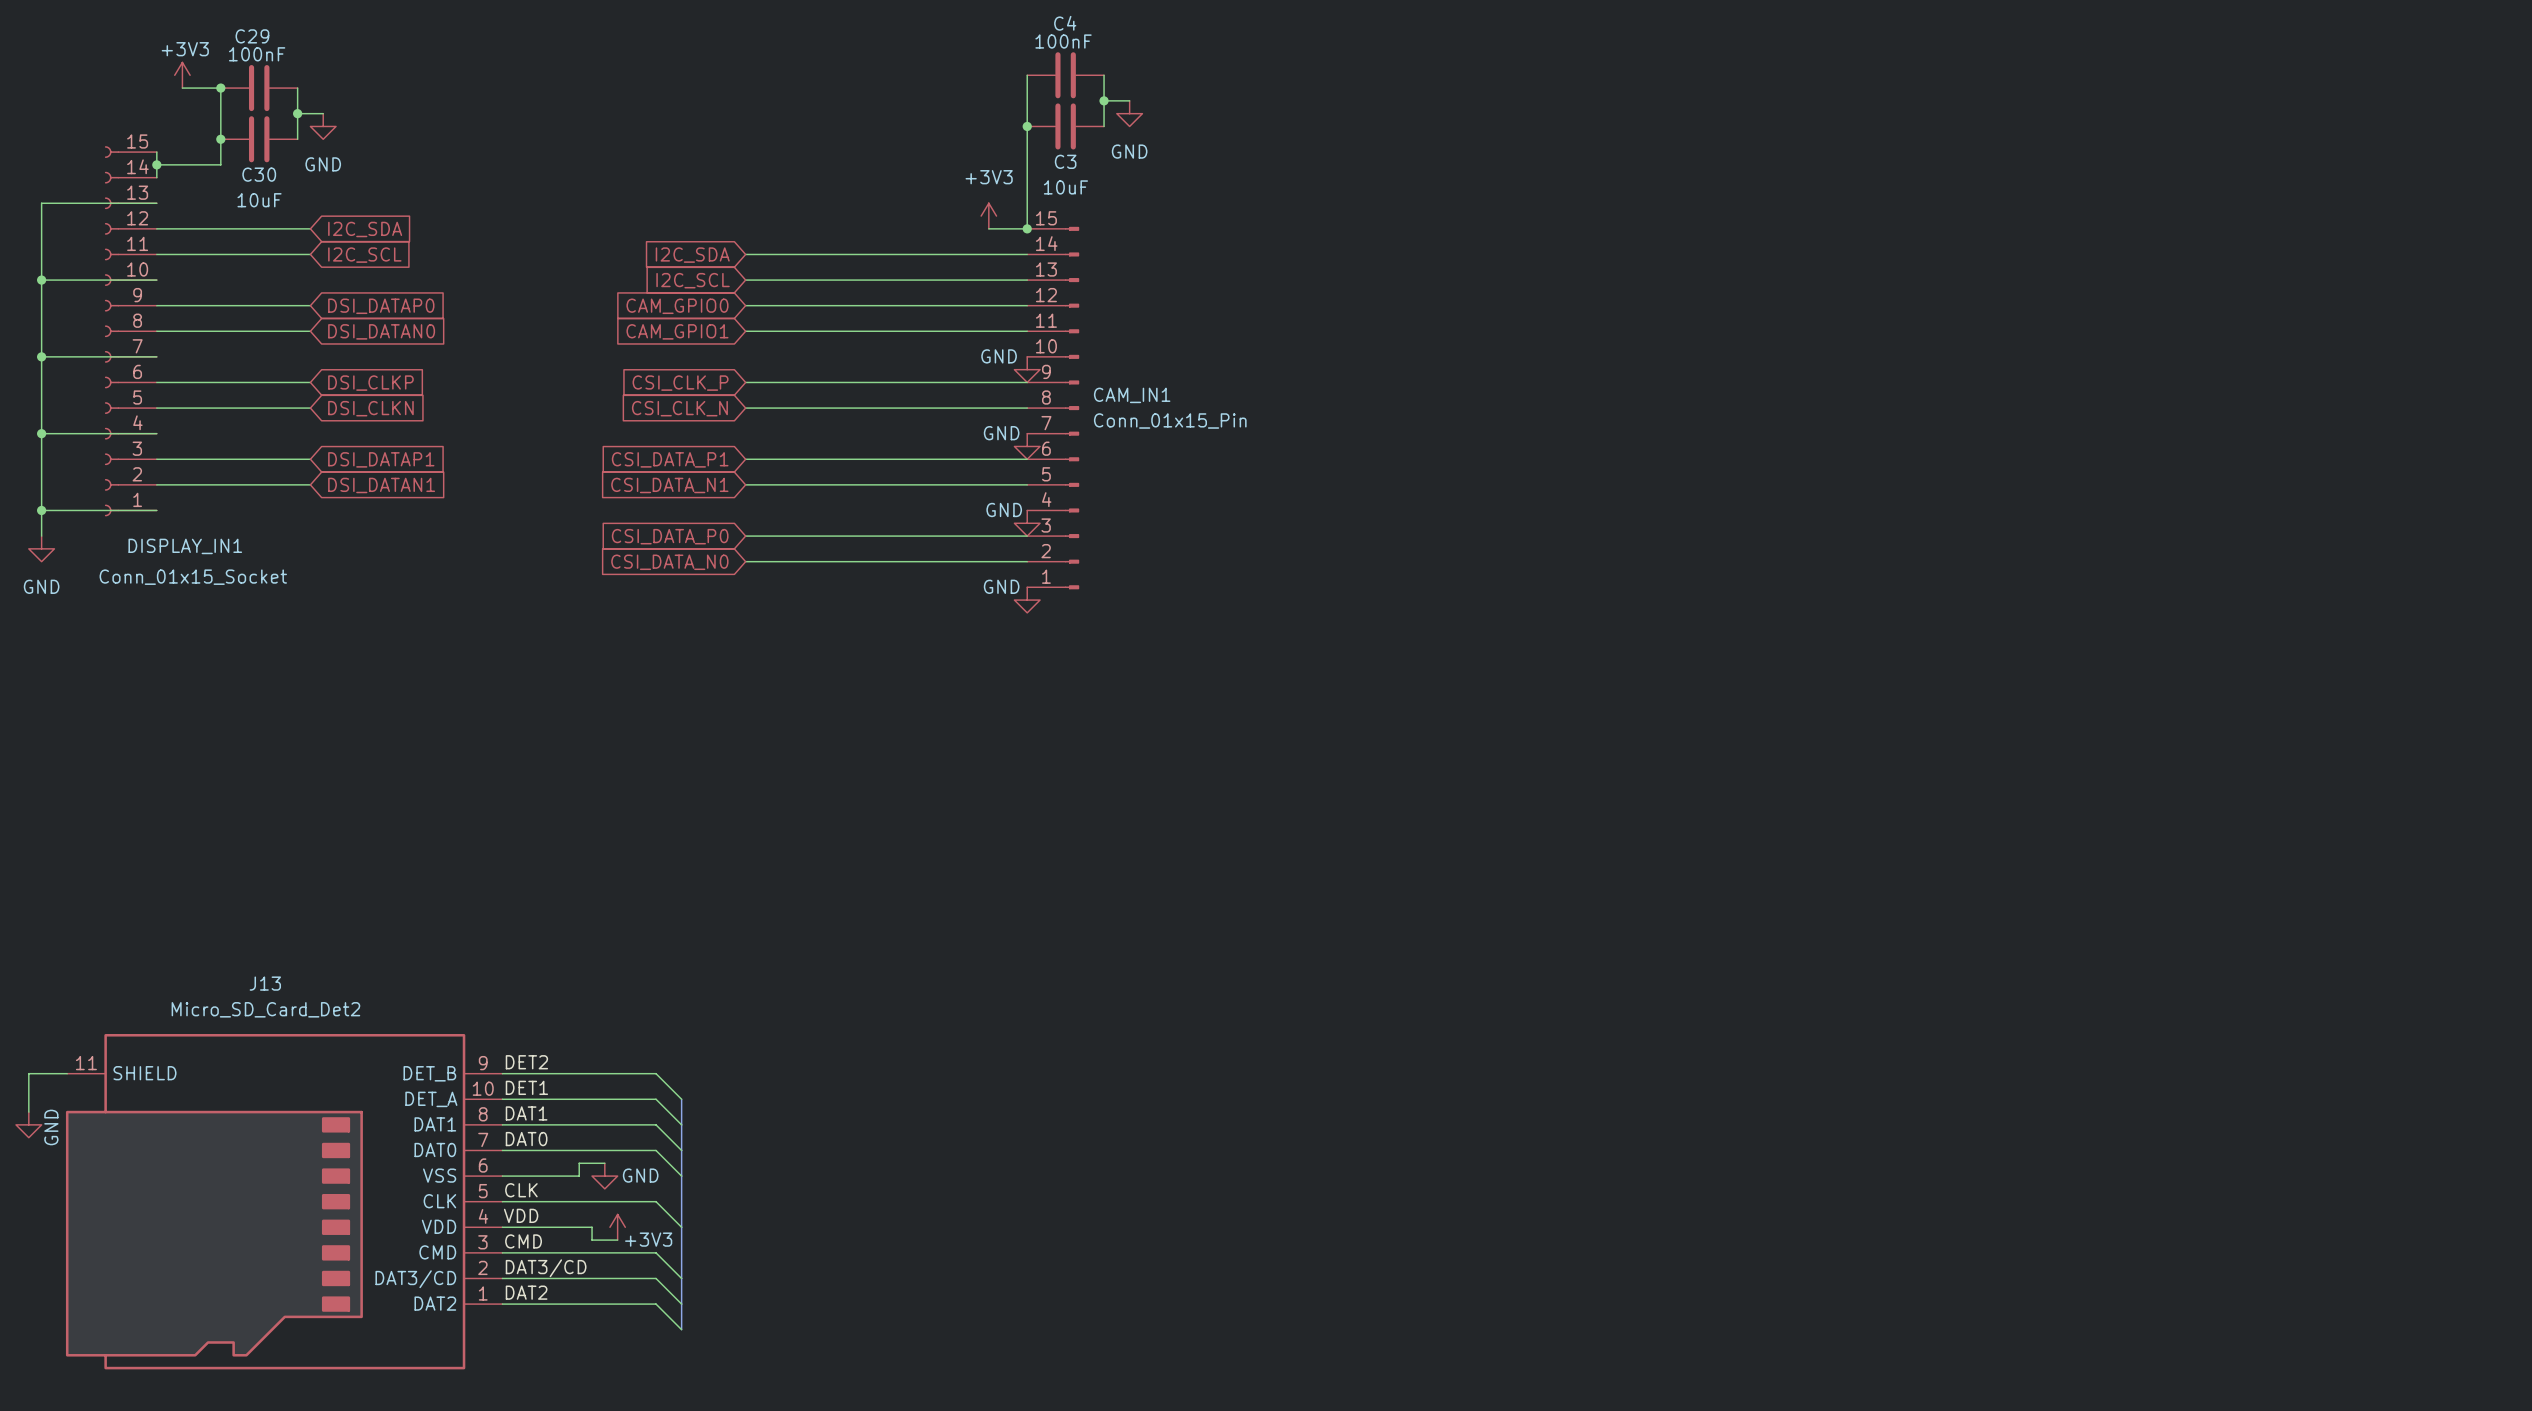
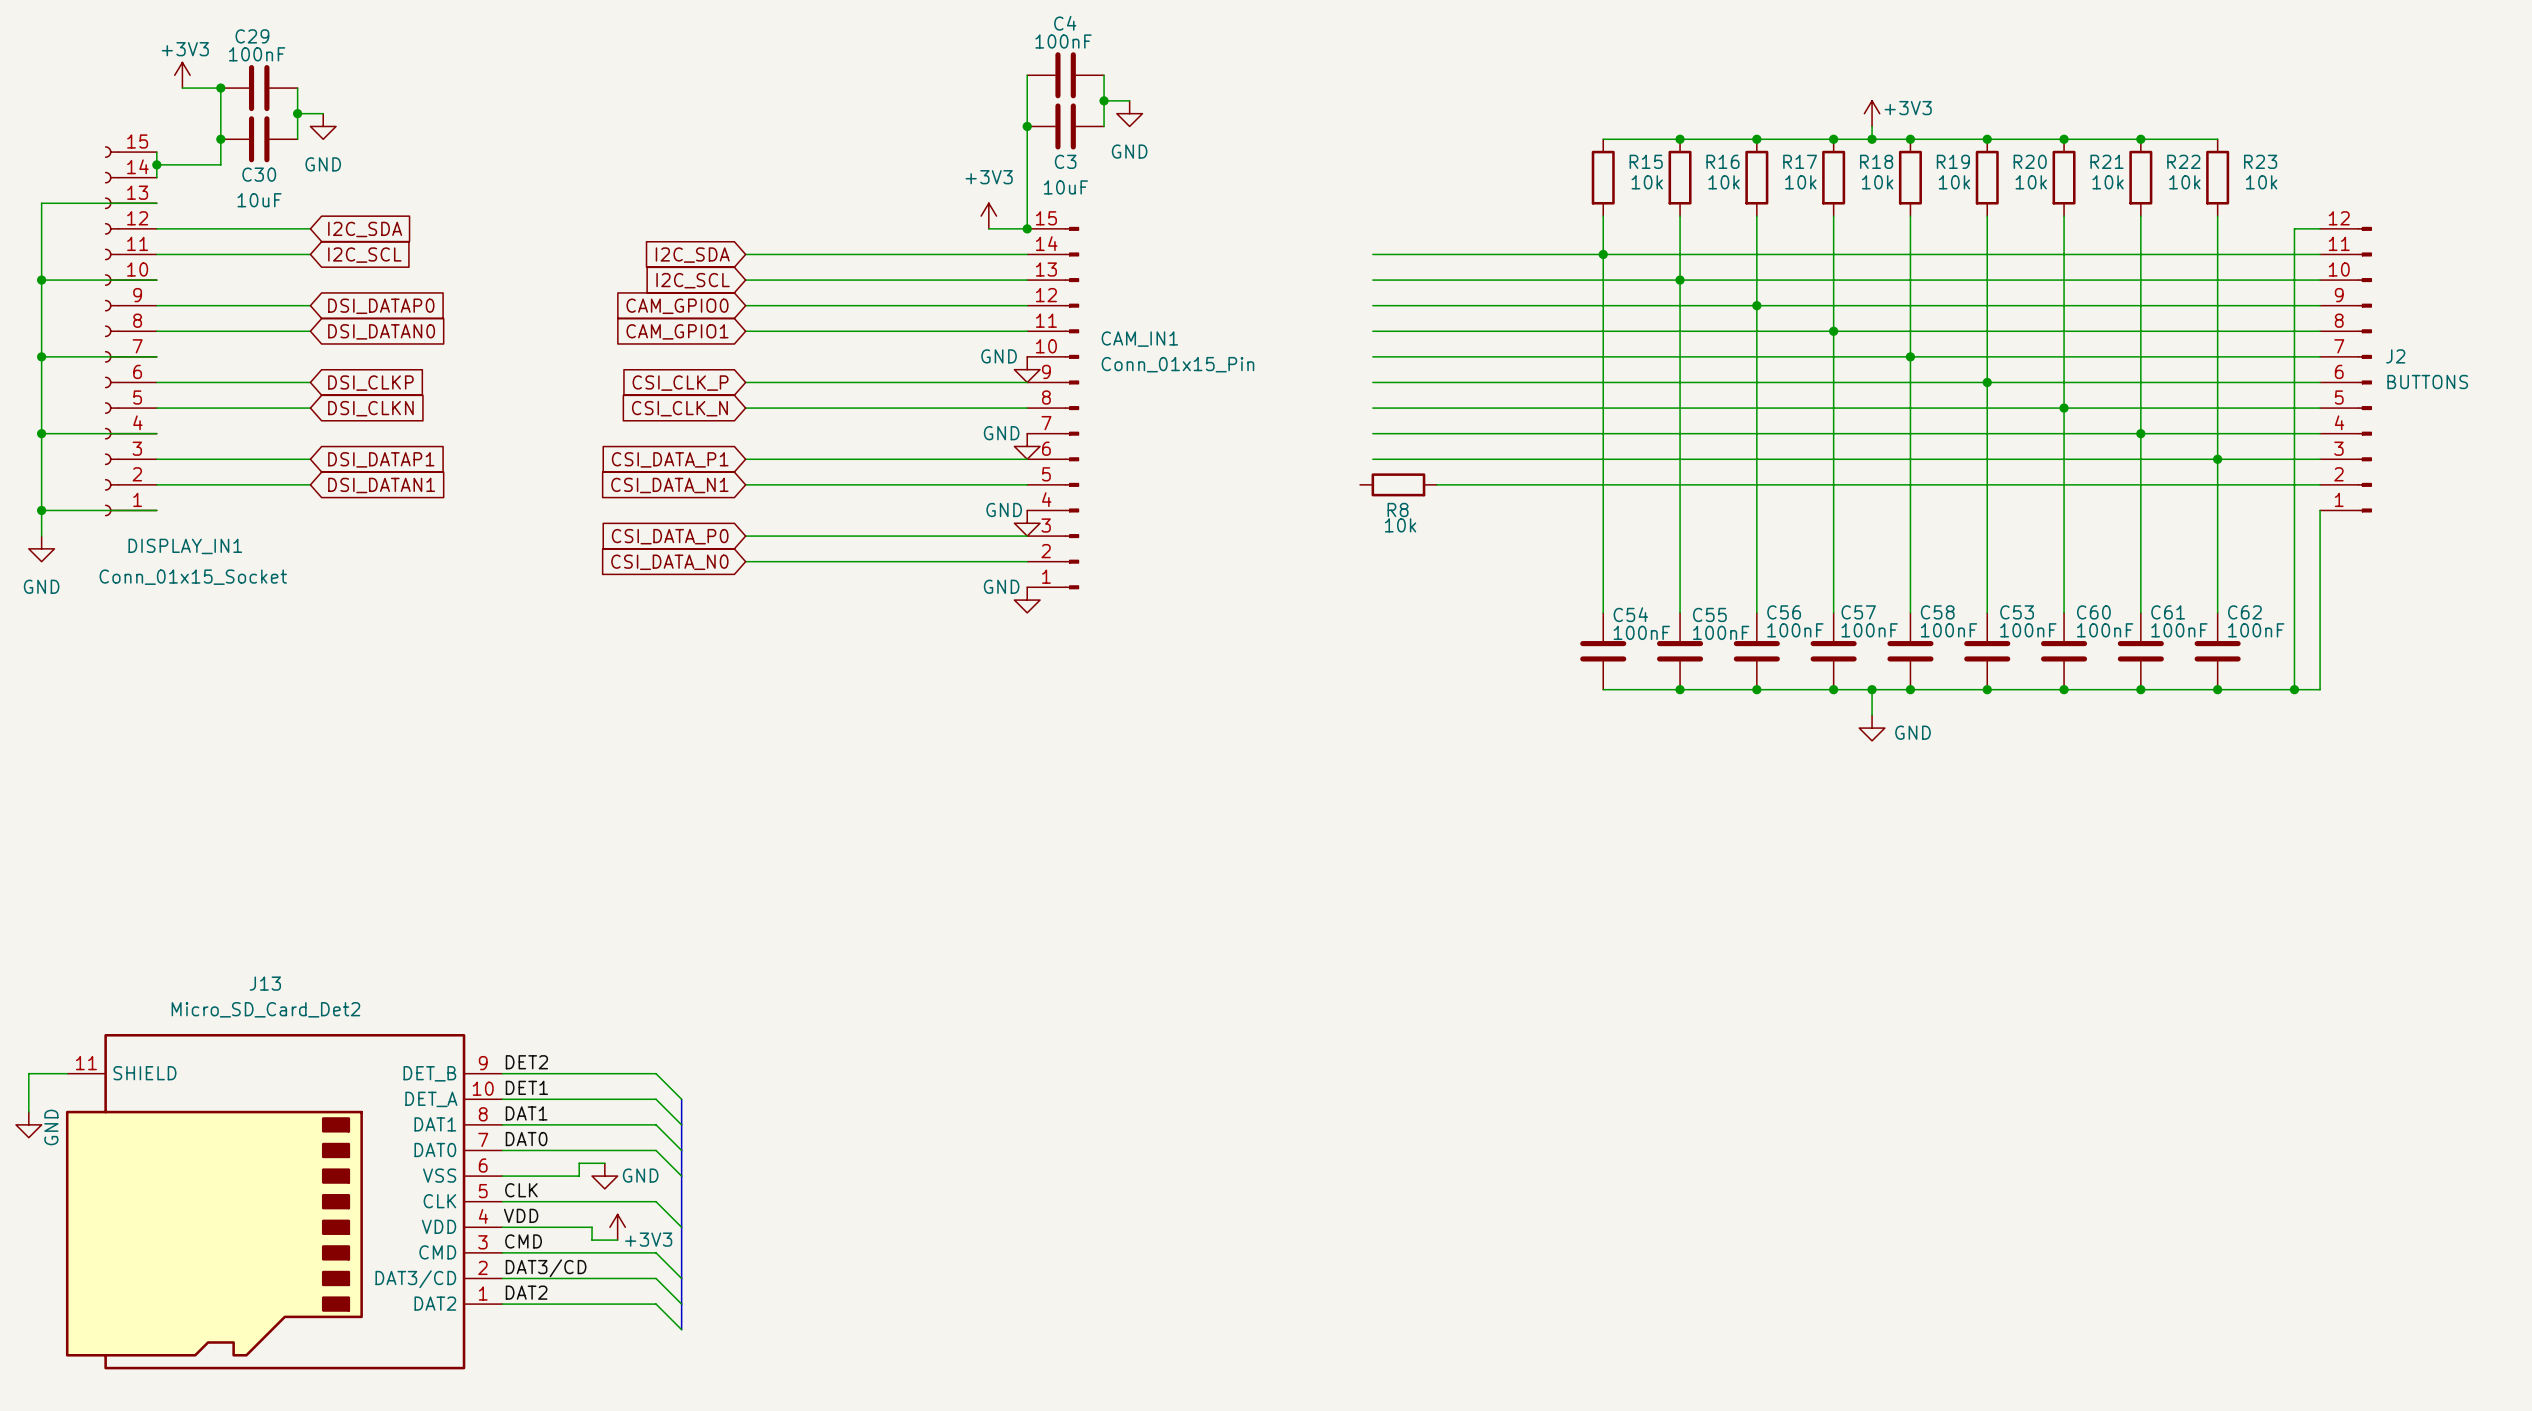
power symbol: none -> +3V3 (1872, 113)
wire: none -> (1872, 126) (1872, 139)
wire: none -> (1603, 139) (2217, 139)
junction: none -> (1680, 139)
junction: none -> (1756, 139)
junction: none -> (1833, 139)
junction: none -> (1872, 139)
junction: none -> (1910, 139)
junction: none -> (1987, 139)
junction: none -> (2064, 139)
junction: none -> (2140, 139)
R15: none -> 10k (1603, 177)
R16: none -> 10k (1680, 177)
R17: none -> 10k (1756, 177)
R18: none -> 10k (1833, 177)
R19: none -> 10k (1910, 177)
R20: none -> 10k (1987, 177)
R21: none -> 10k (2064, 177)
R22: none -> 10k (2140, 177)
R23: none -> 10k (2217, 177)
wire: none -> (1603, 216) (1603, 612)
wire: none -> (1680, 216) (1680, 612)
wire: none -> (1756, 216) (1756, 612)
wire: none -> (1833, 216) (1833, 612)
wire: none -> (1910, 216) (1910, 612)
wire: none -> (1987, 216) (1987, 612)
wire: none -> (2064, 216) (2064, 612)
wire: none -> (2140, 216) (2140, 612)
wire: none -> (2217, 216) (2217, 612)
wire: none -> (2320, 228) (2294, 228) (2294, 689)
wire: none -> (1372, 254) (2320, 254)
junction: none -> (1603, 254)
wire: none -> (1372, 280) (2320, 280)
junction: none -> (1680, 280)
wire: none -> (1372, 305) (2320, 305)
junction: none -> (1756, 305)
wire: none -> (1372, 331) (2320, 331)
junction: none -> (1833, 331)
wire: none -> (1372, 356) (2320, 356)
junction: none -> (1910, 356)
J2: none -> BUTTONS (2346, 369)
wire: none -> (1372, 382) (2320, 382)
junction: none -> (1987, 382)
CAM_IN1 name position: CAM_IN1 (1132, 395) -> CAM_IN1 (1139, 339)
wire: none -> (1372, 408) (2320, 408)
junction: none -> (2064, 408)
CAM_IN1 value position: Conn_01x15_Pin (1170, 421) -> Conn_01x15_Pin (1177, 364)
wire: none -> (1372, 433) (2320, 433)
junction: none -> (2140, 433)
wire: none -> (1372, 459) (2320, 459)
junction: none -> (2217, 459)
R8: none -> 10k (1398, 484)
wire: none -> (1436, 484) (2320, 484)
wire: none -> (2320, 510) (2320, 689) (1603, 689)
C54: none -> 100nF (1603, 651)
C55: none -> 100nF (1680, 651)
C56: none -> 100nF (1756, 651)
C57: none -> 100nF (1833, 651)
C58: none -> 100nF (1910, 651)
C53: none -> 100nF (1987, 651)
C60: none -> 100nF (2064, 651)
C61: none -> 100nF (2140, 651)
C62: none -> 100nF (2217, 651)
junction: none -> (1680, 689)
junction: none -> (1756, 689)
junction: none -> (1833, 689)
wire: none -> (1872, 689) (1872, 715)
junction: none -> (1872, 689)
junction: none -> (1910, 689)
junction: none -> (1987, 689)
junction: none -> (2064, 689)
junction: none -> (2140, 689)
junction: none -> (2217, 689)
junction: none -> (2294, 689)
power symbol: none -> GND (1872, 728)

